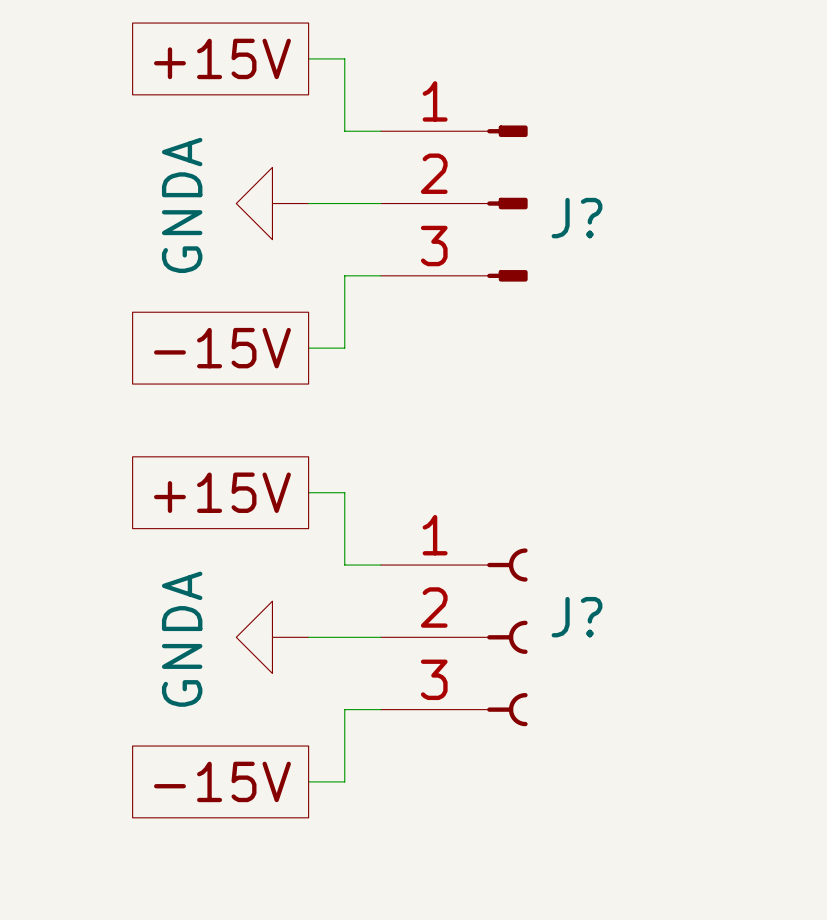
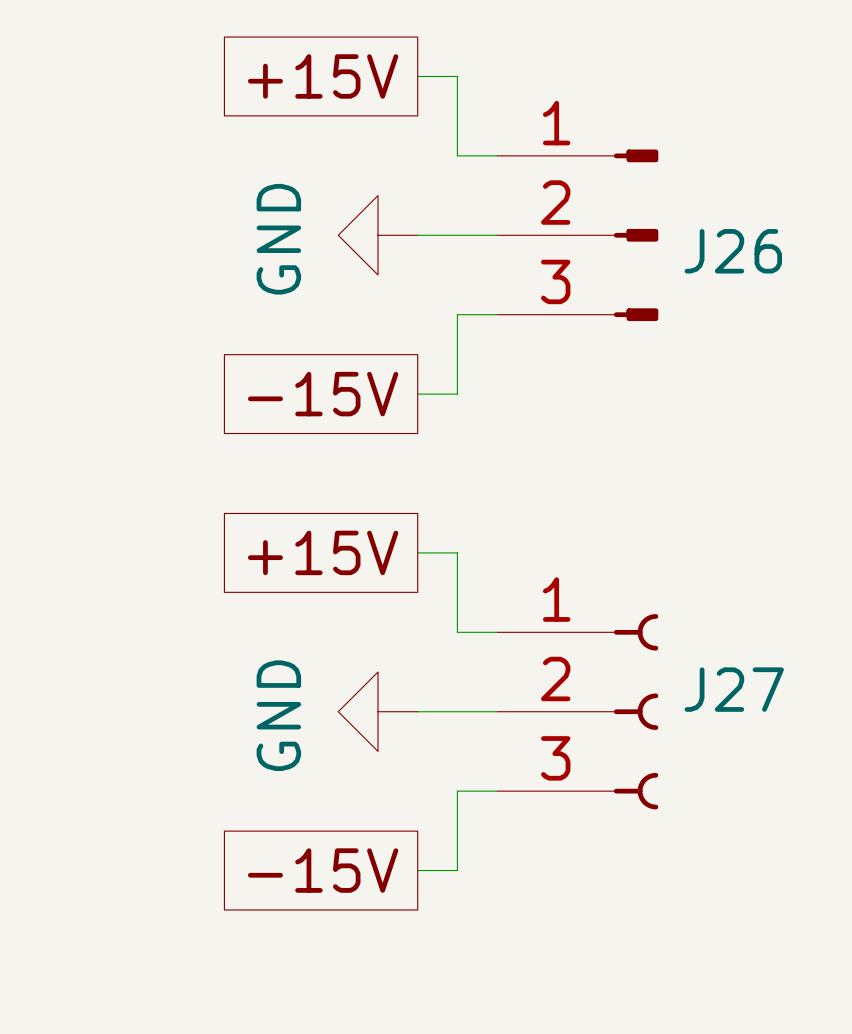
power symbol: GNDA (272, 203) -> GND (378, 235)
J? name: J? (576, 218) -> J26 (733, 251)
J? name: J? (576, 617) -> J27 (734, 689)
power symbol: GNDA (272, 637) -> GND (378, 711)

